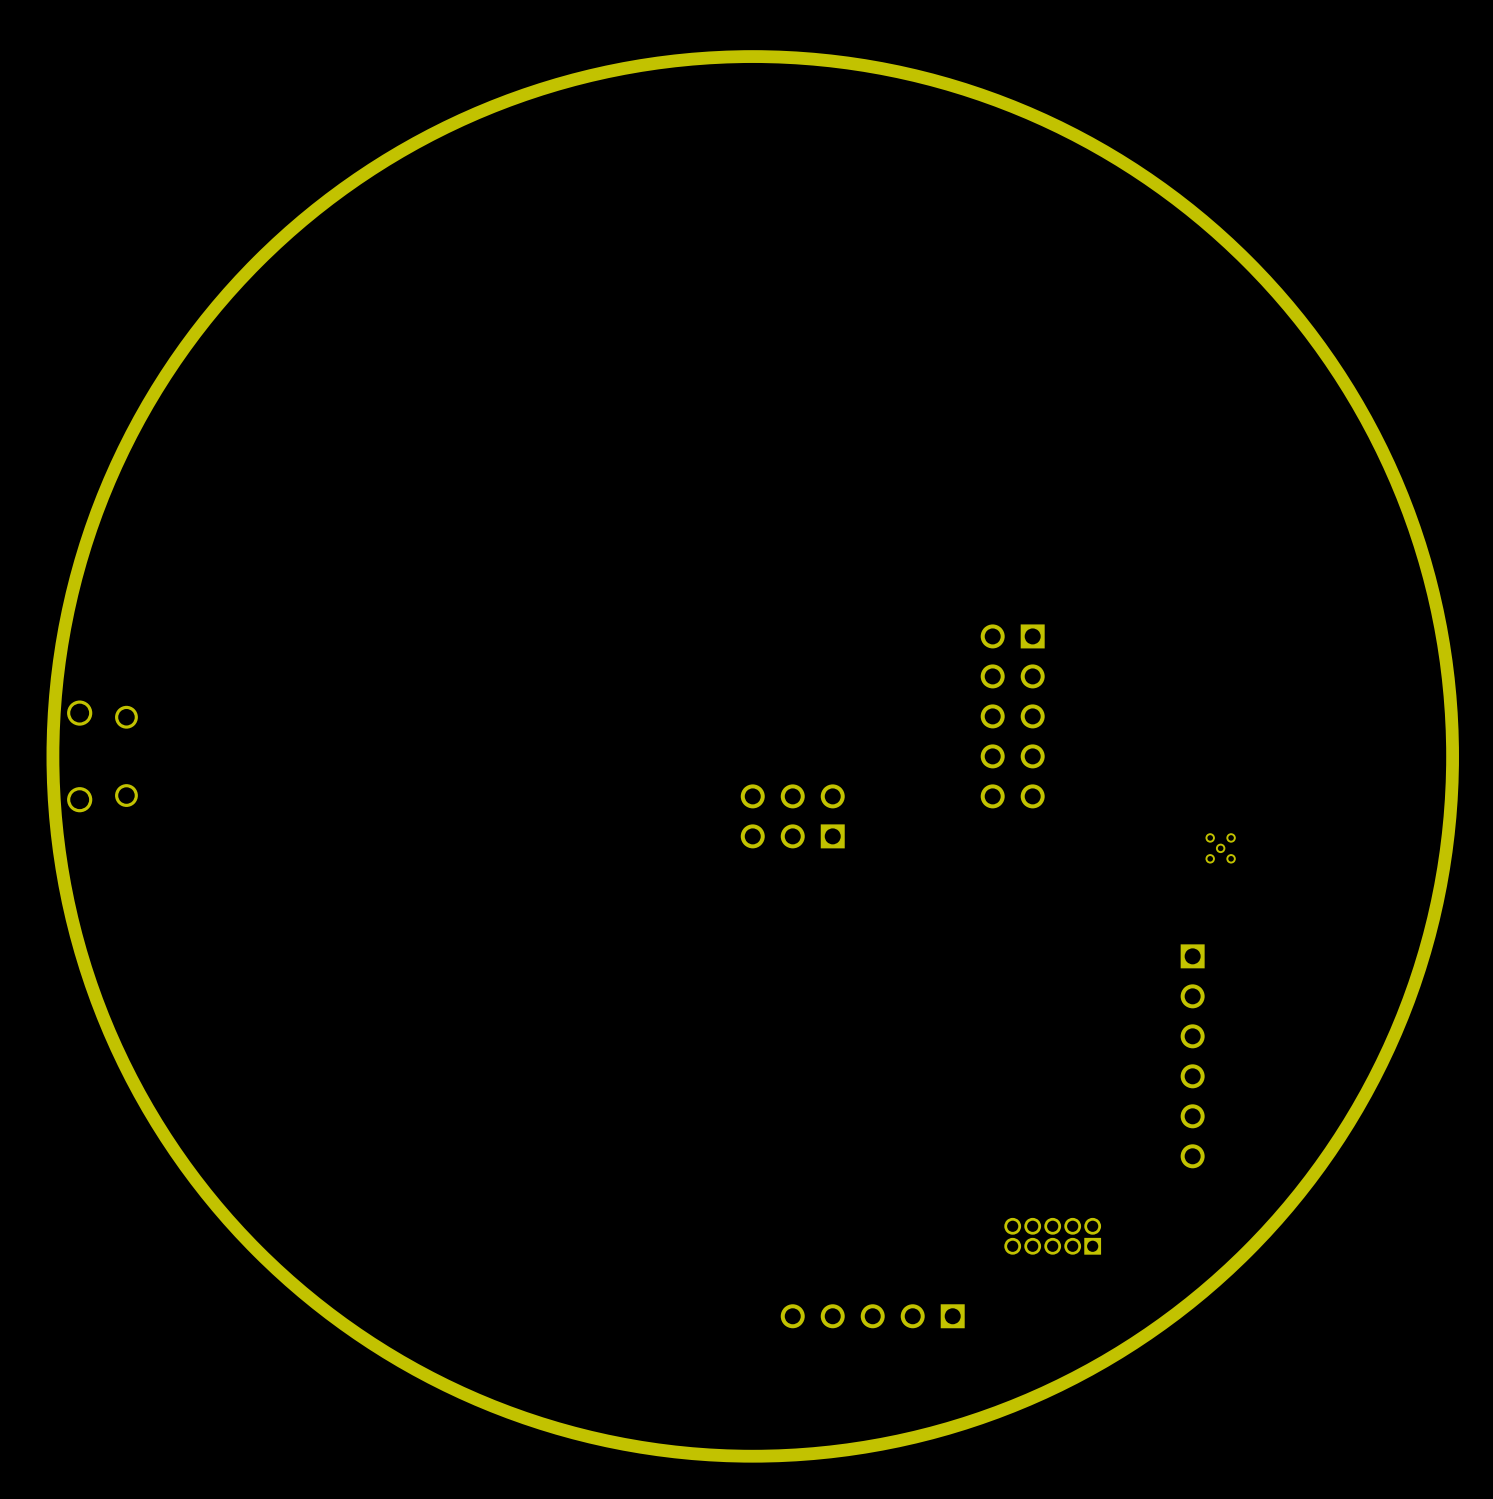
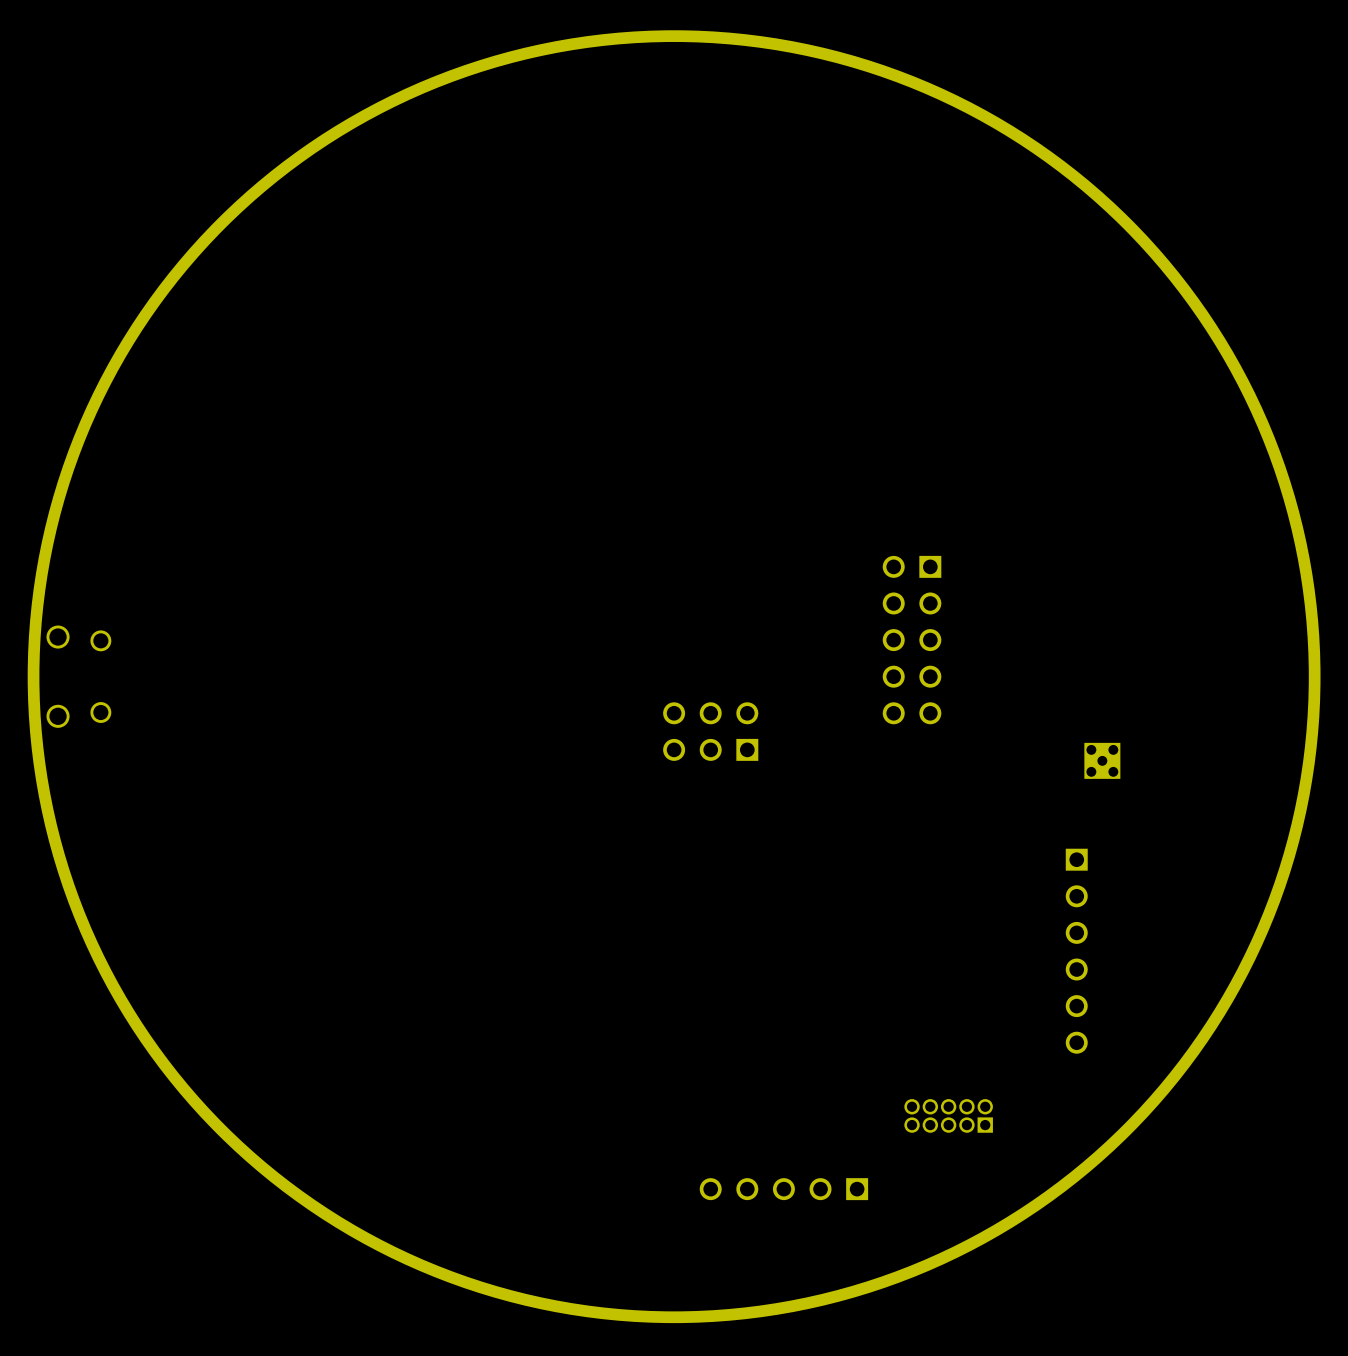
part footprint: [1205, 833, 1236, 864] -> [1084, 742, 1121, 779]

